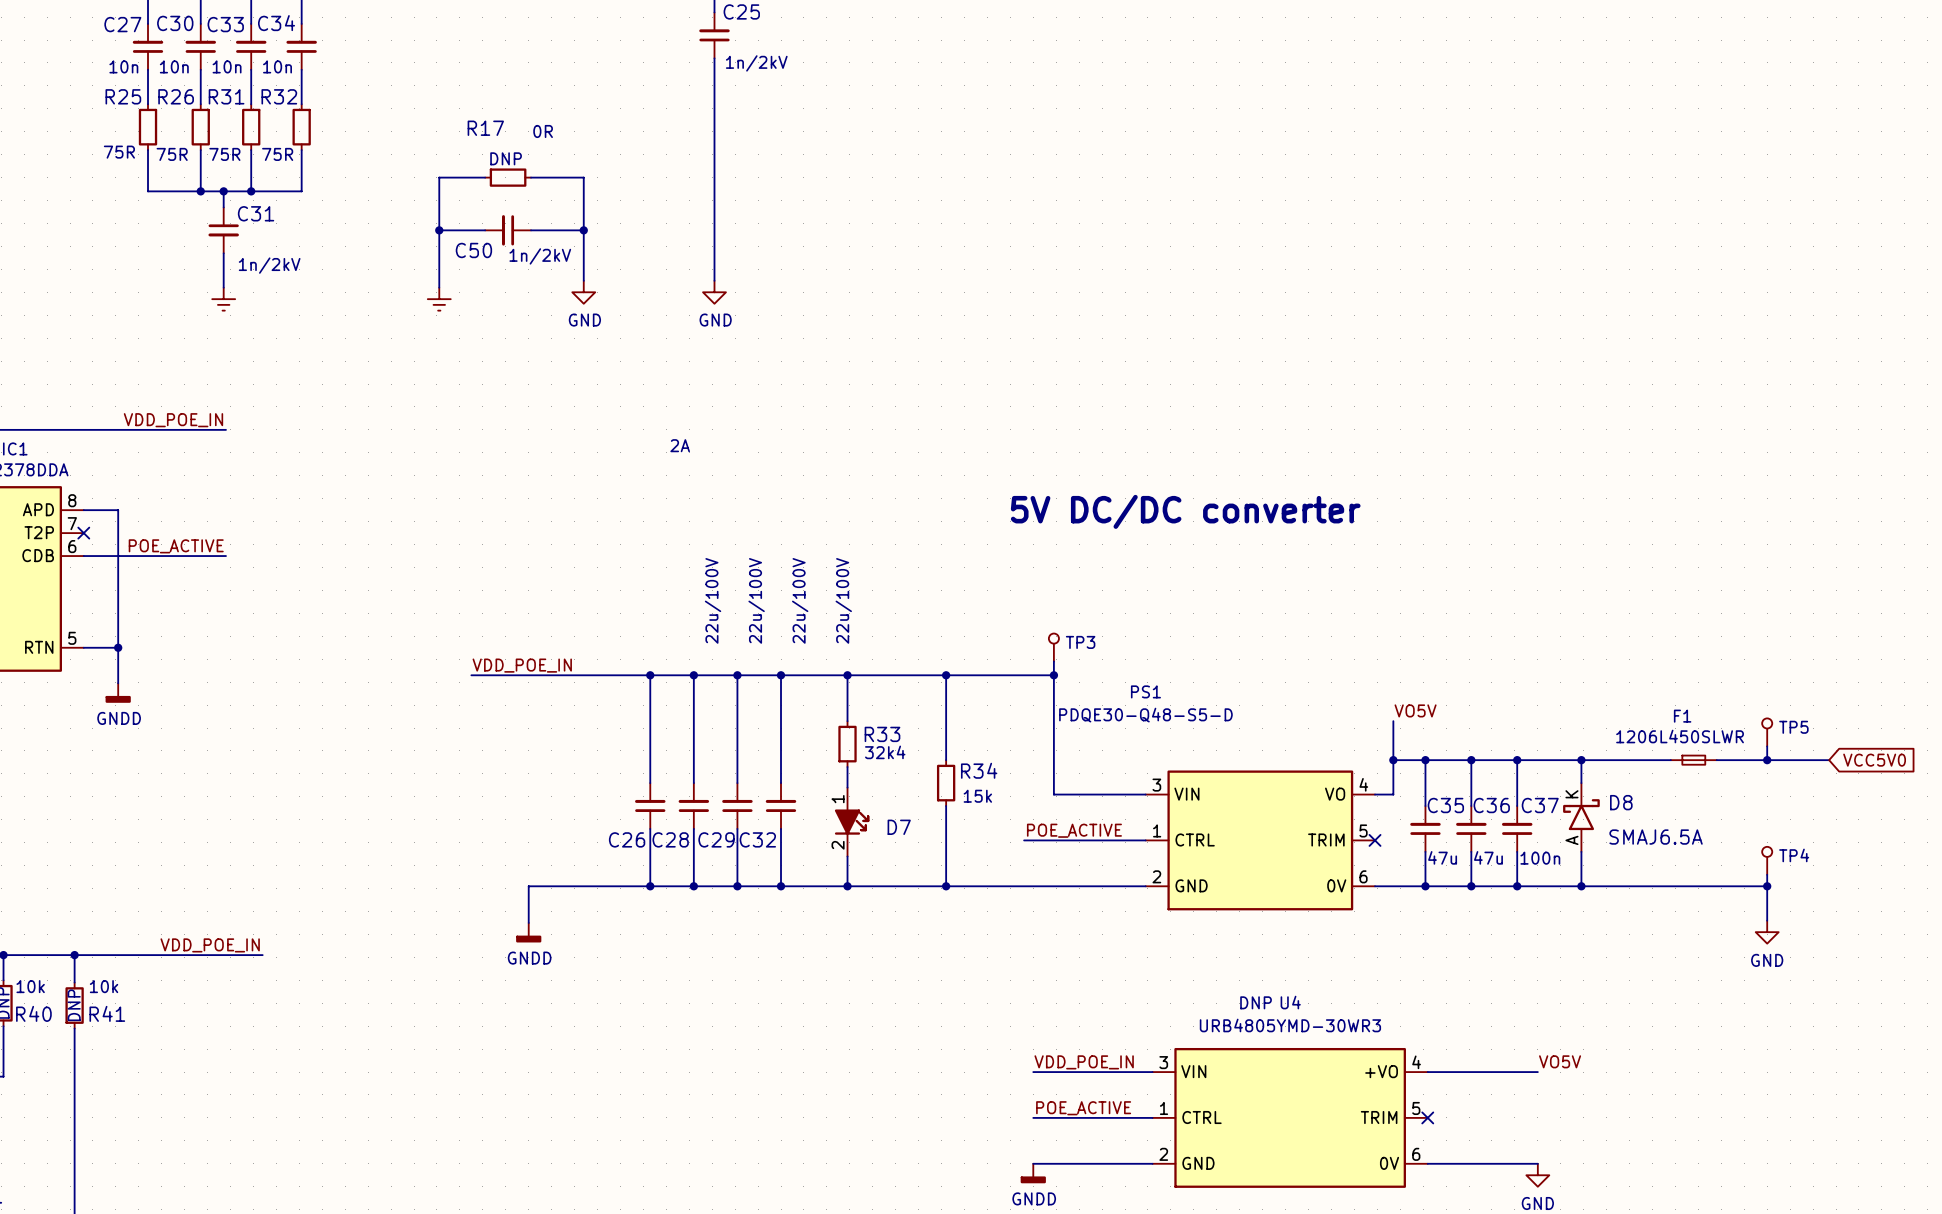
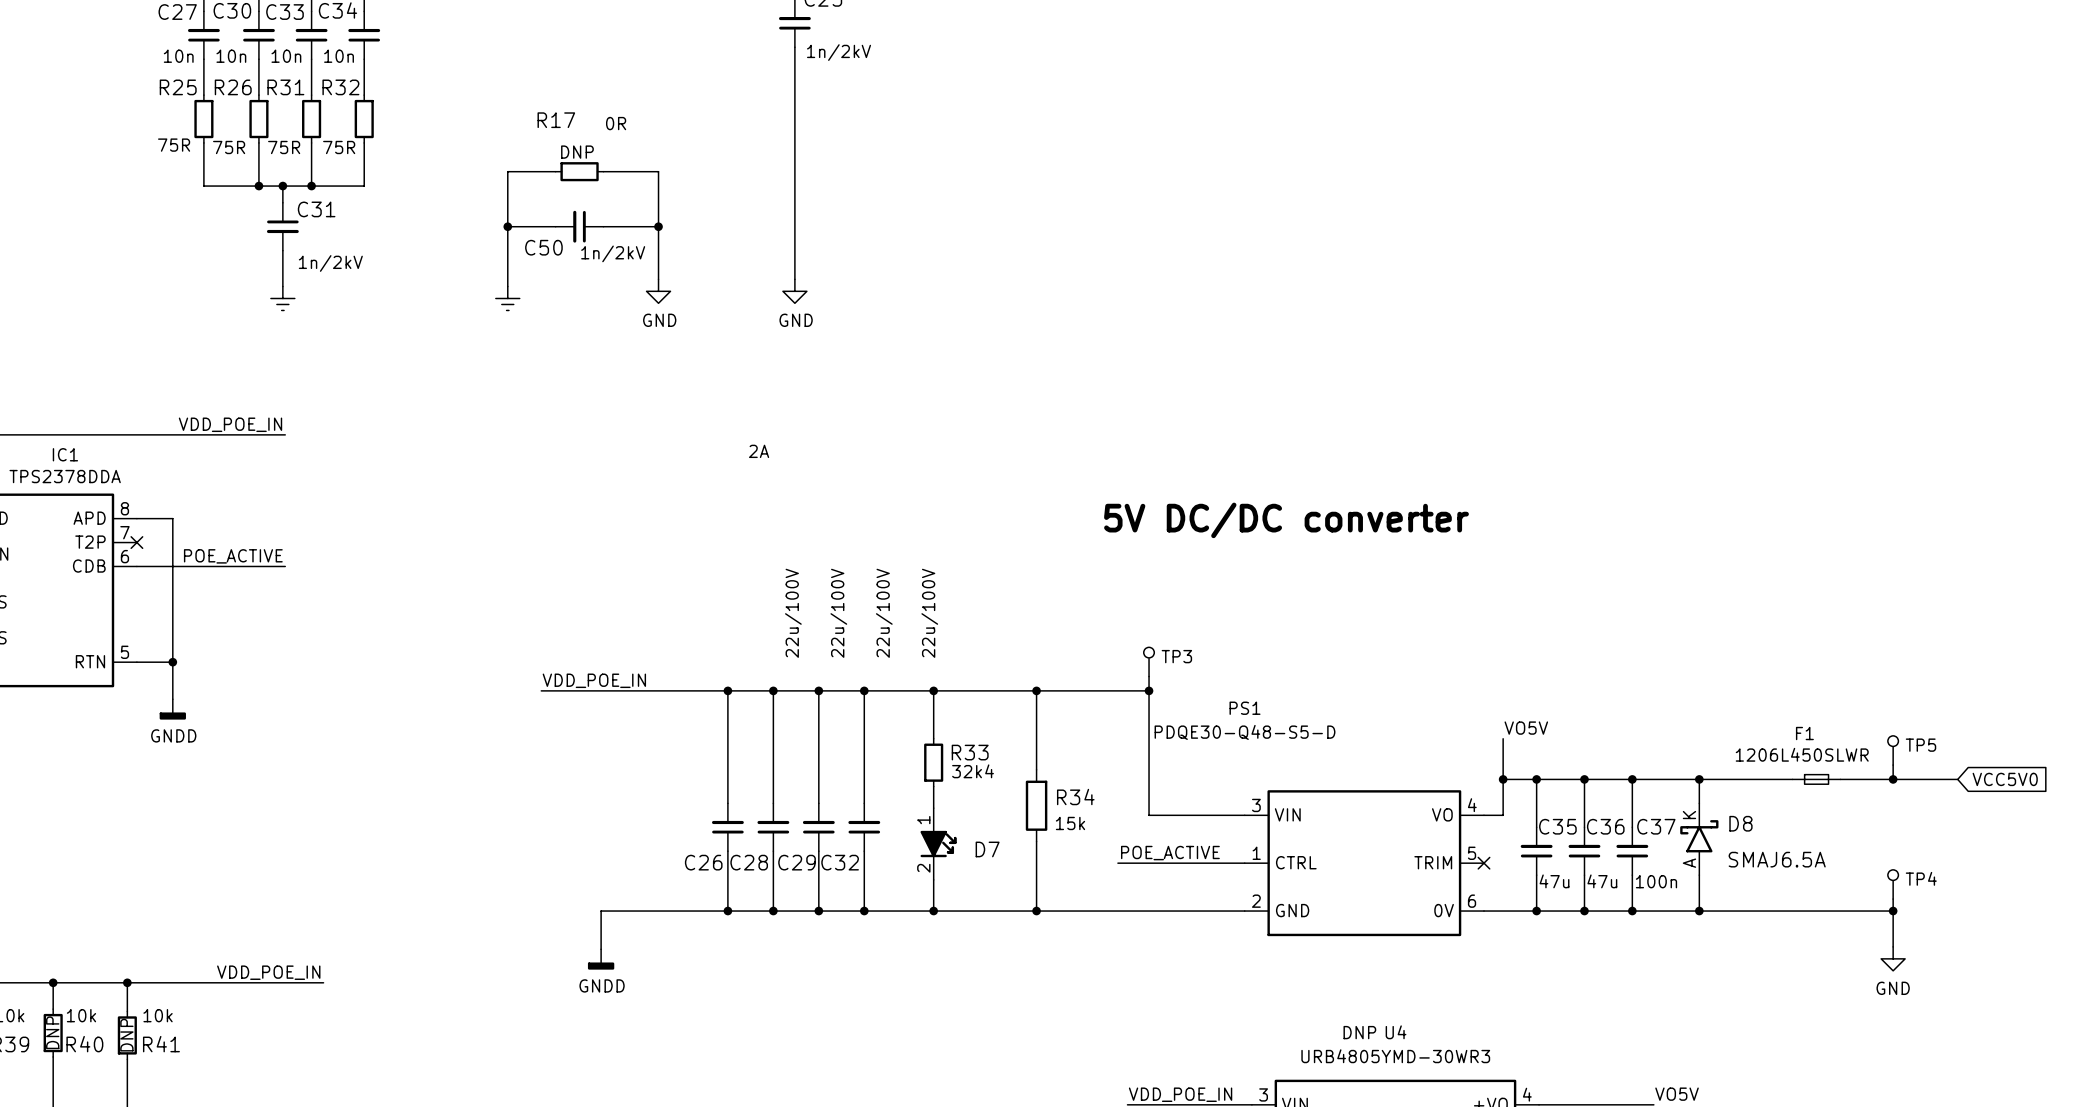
R34 symbol: [936, 760, 956, 807] -> [1025, 769, 1048, 842]

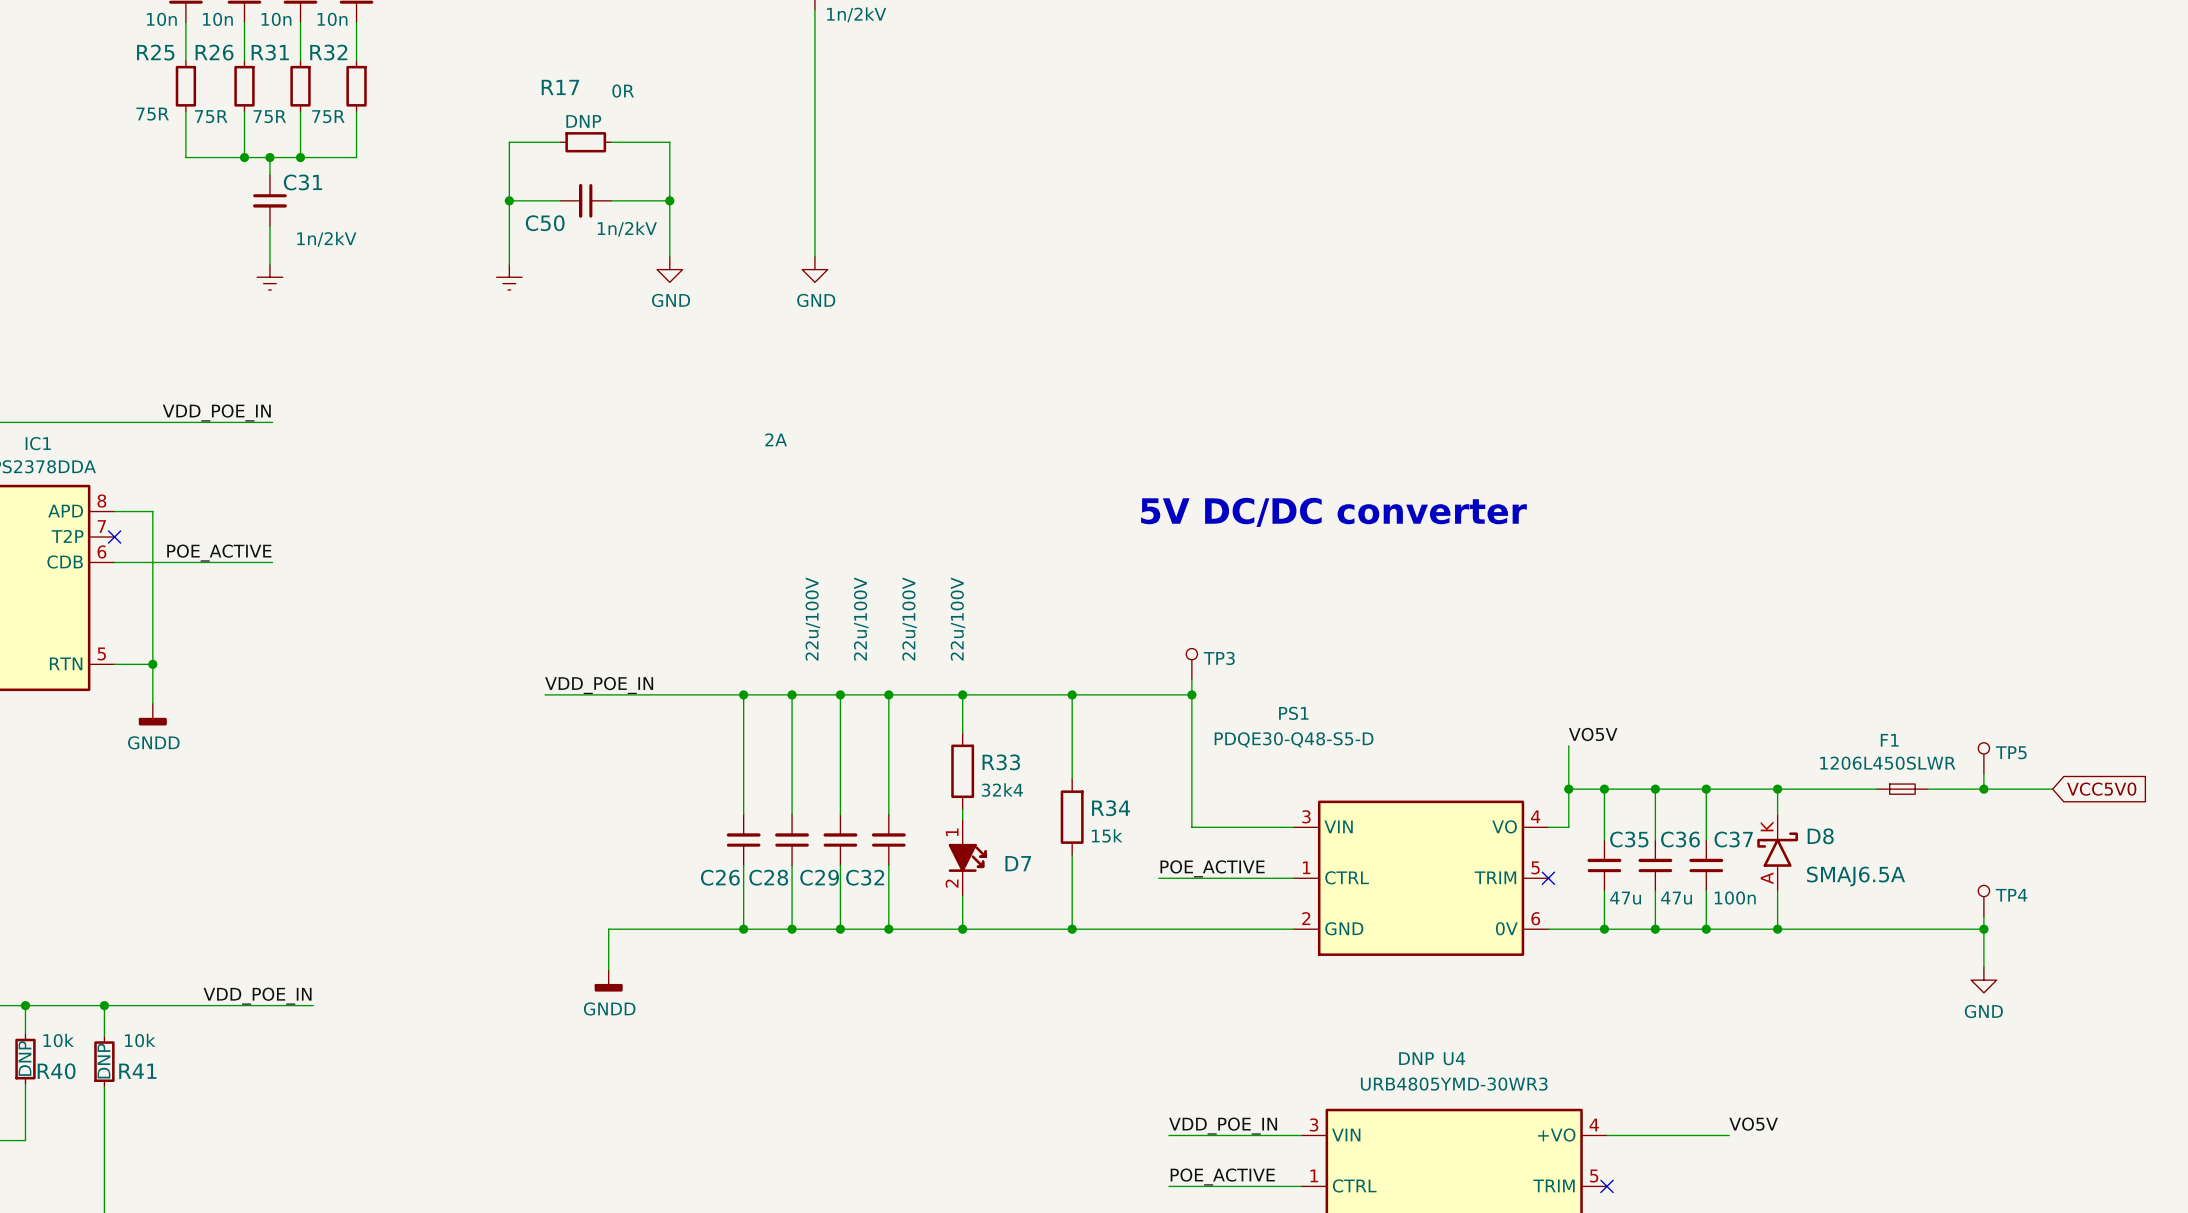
R33 symbol: [924, 738, 944, 787] -> [951, 733, 975, 810]

